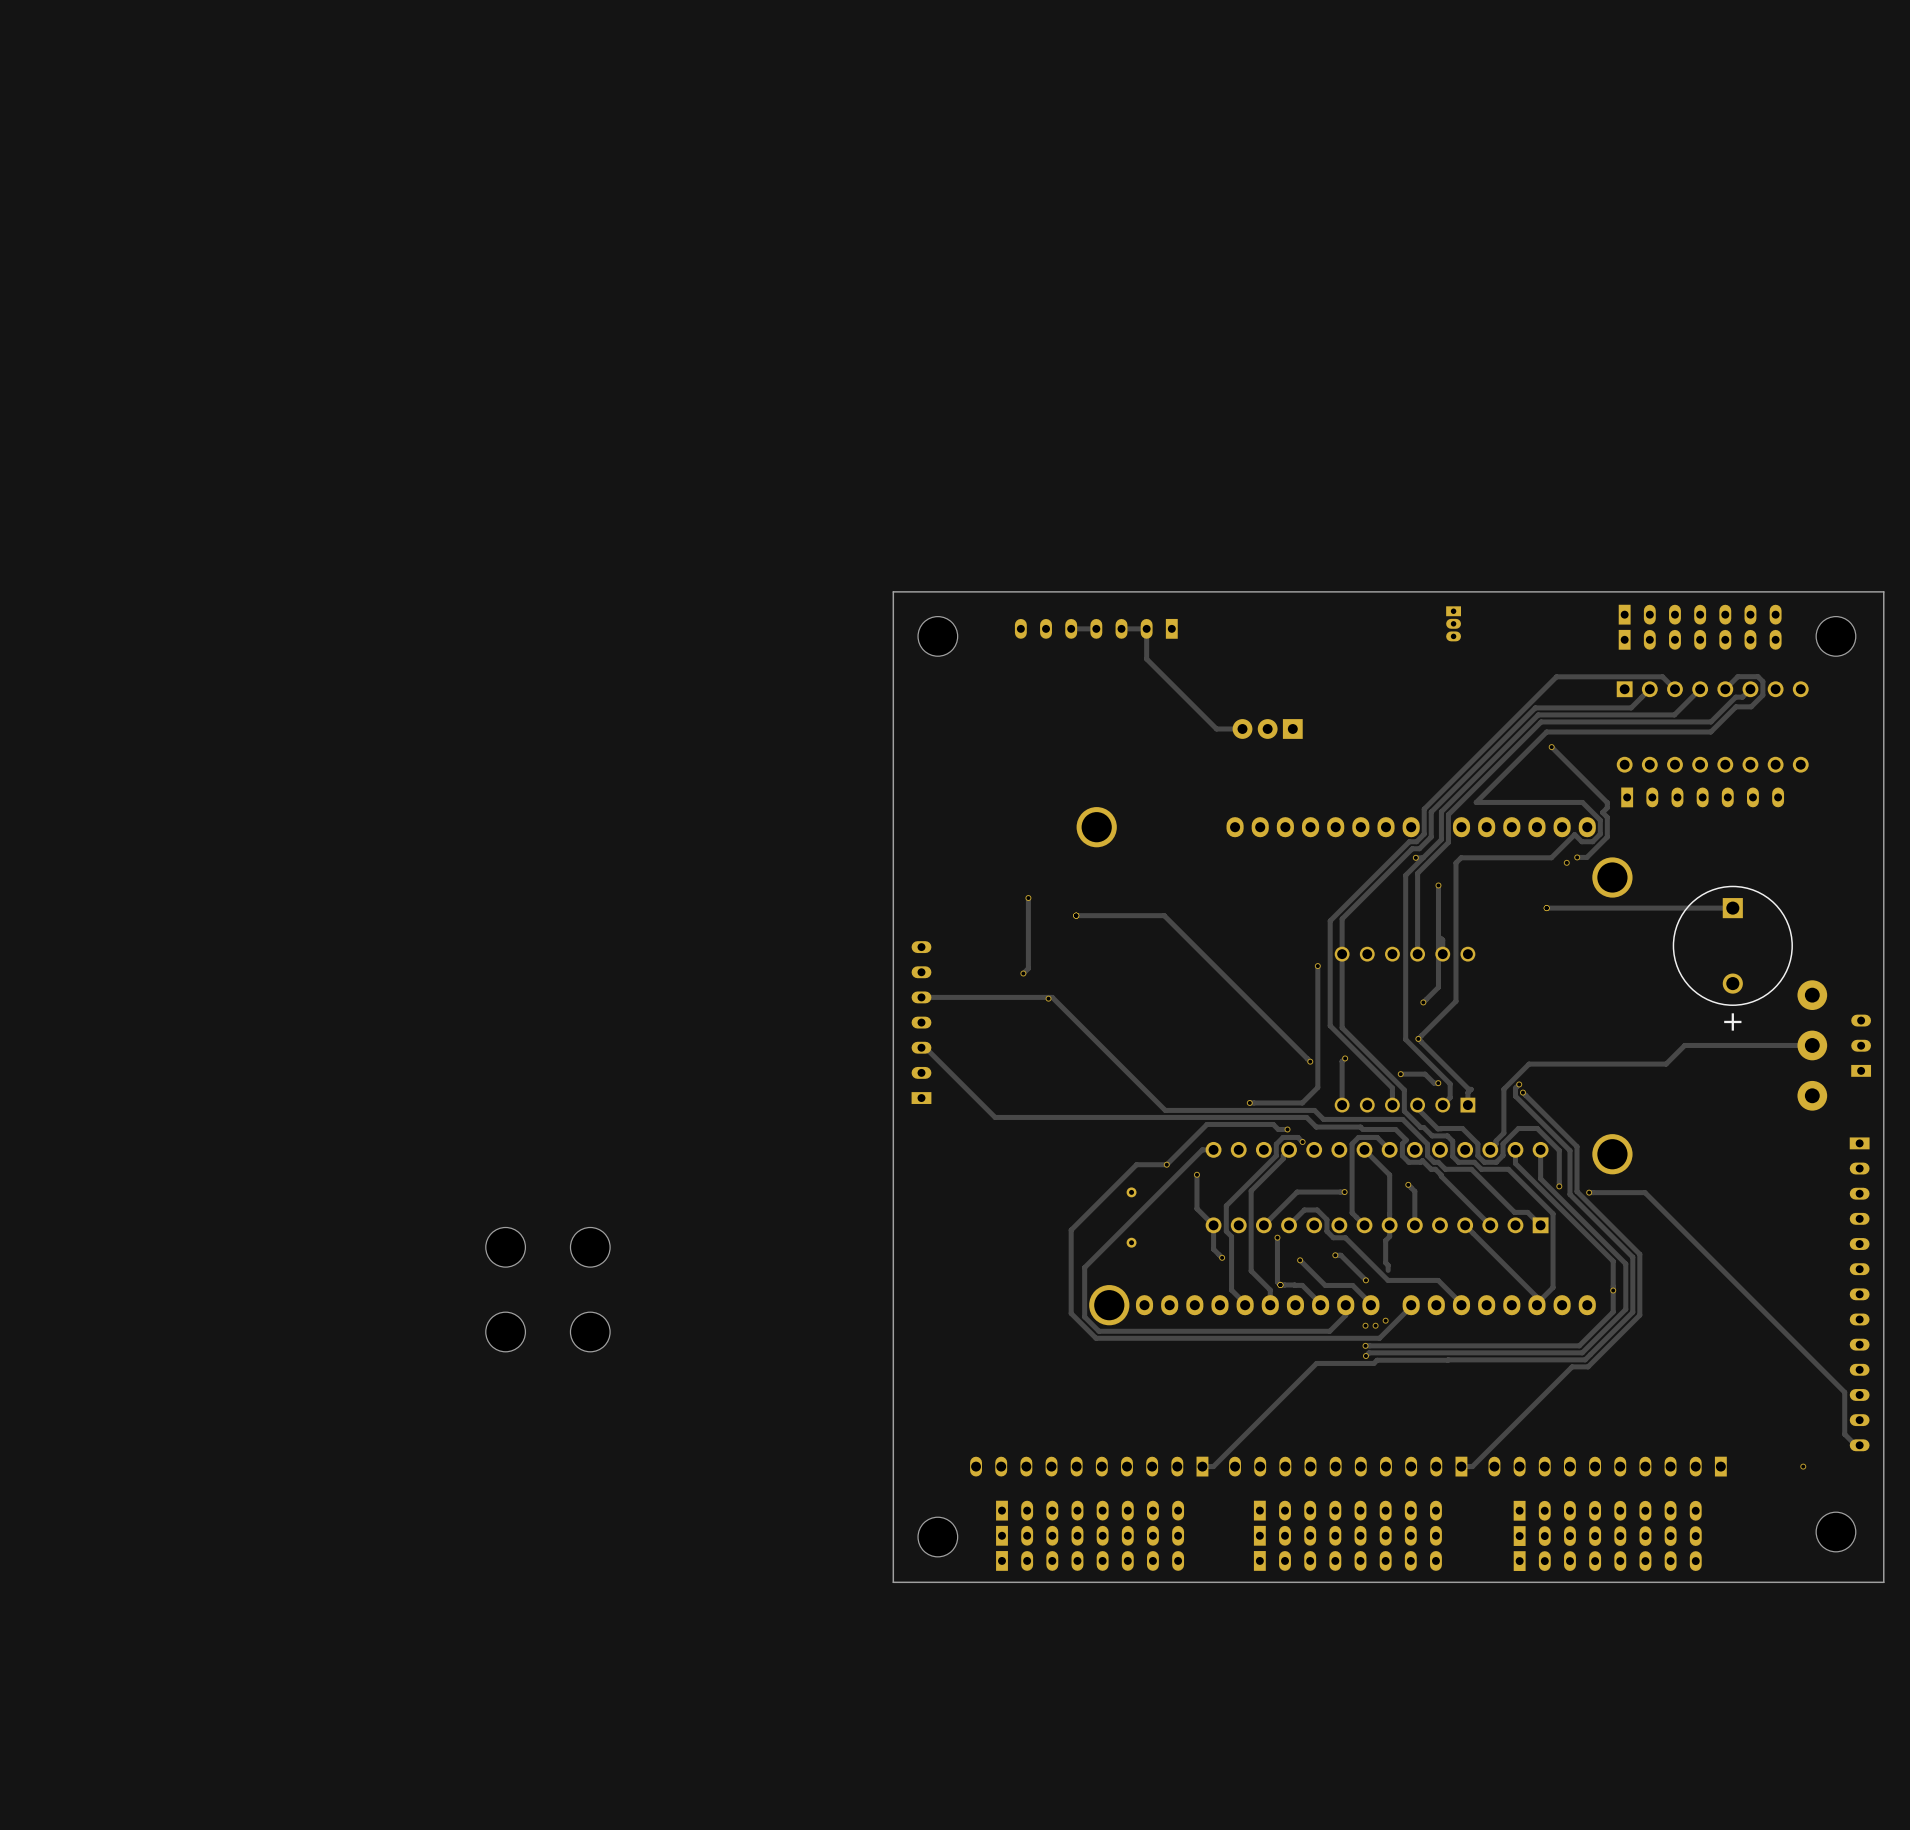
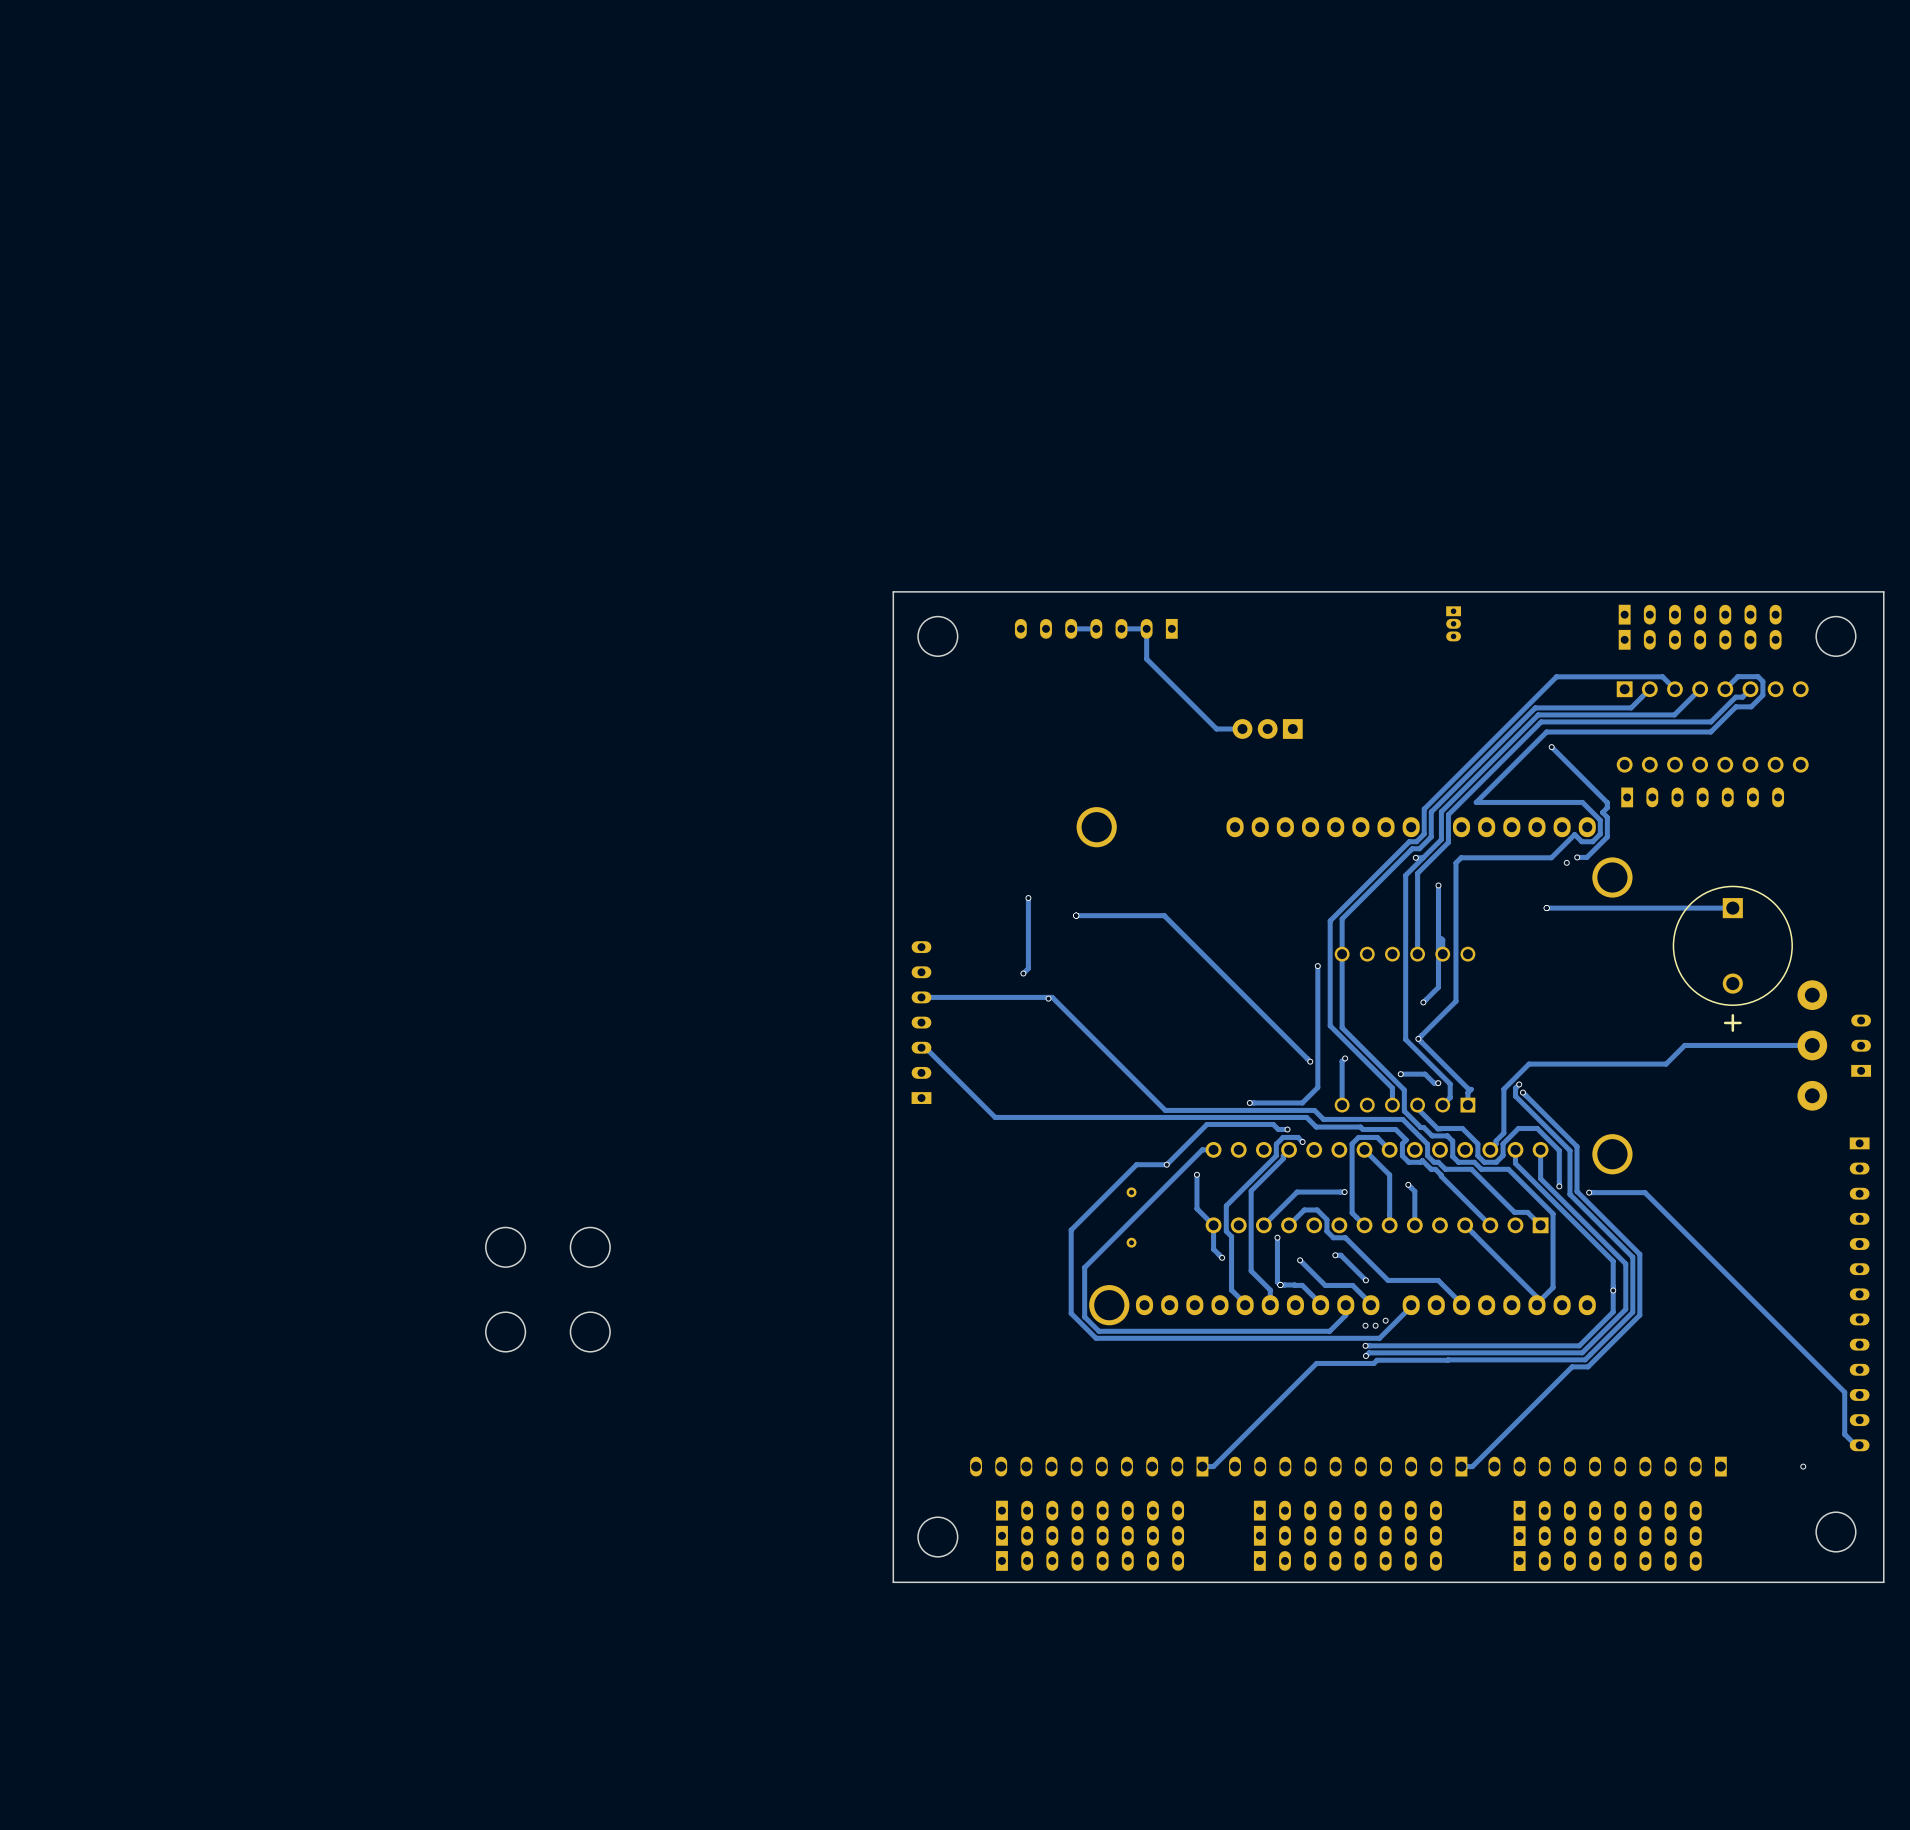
track: (1389, 1225) (1389, 1236) (1385, 1240) (1385, 1262) (1388, 1265) (1388, 1270) -> none

